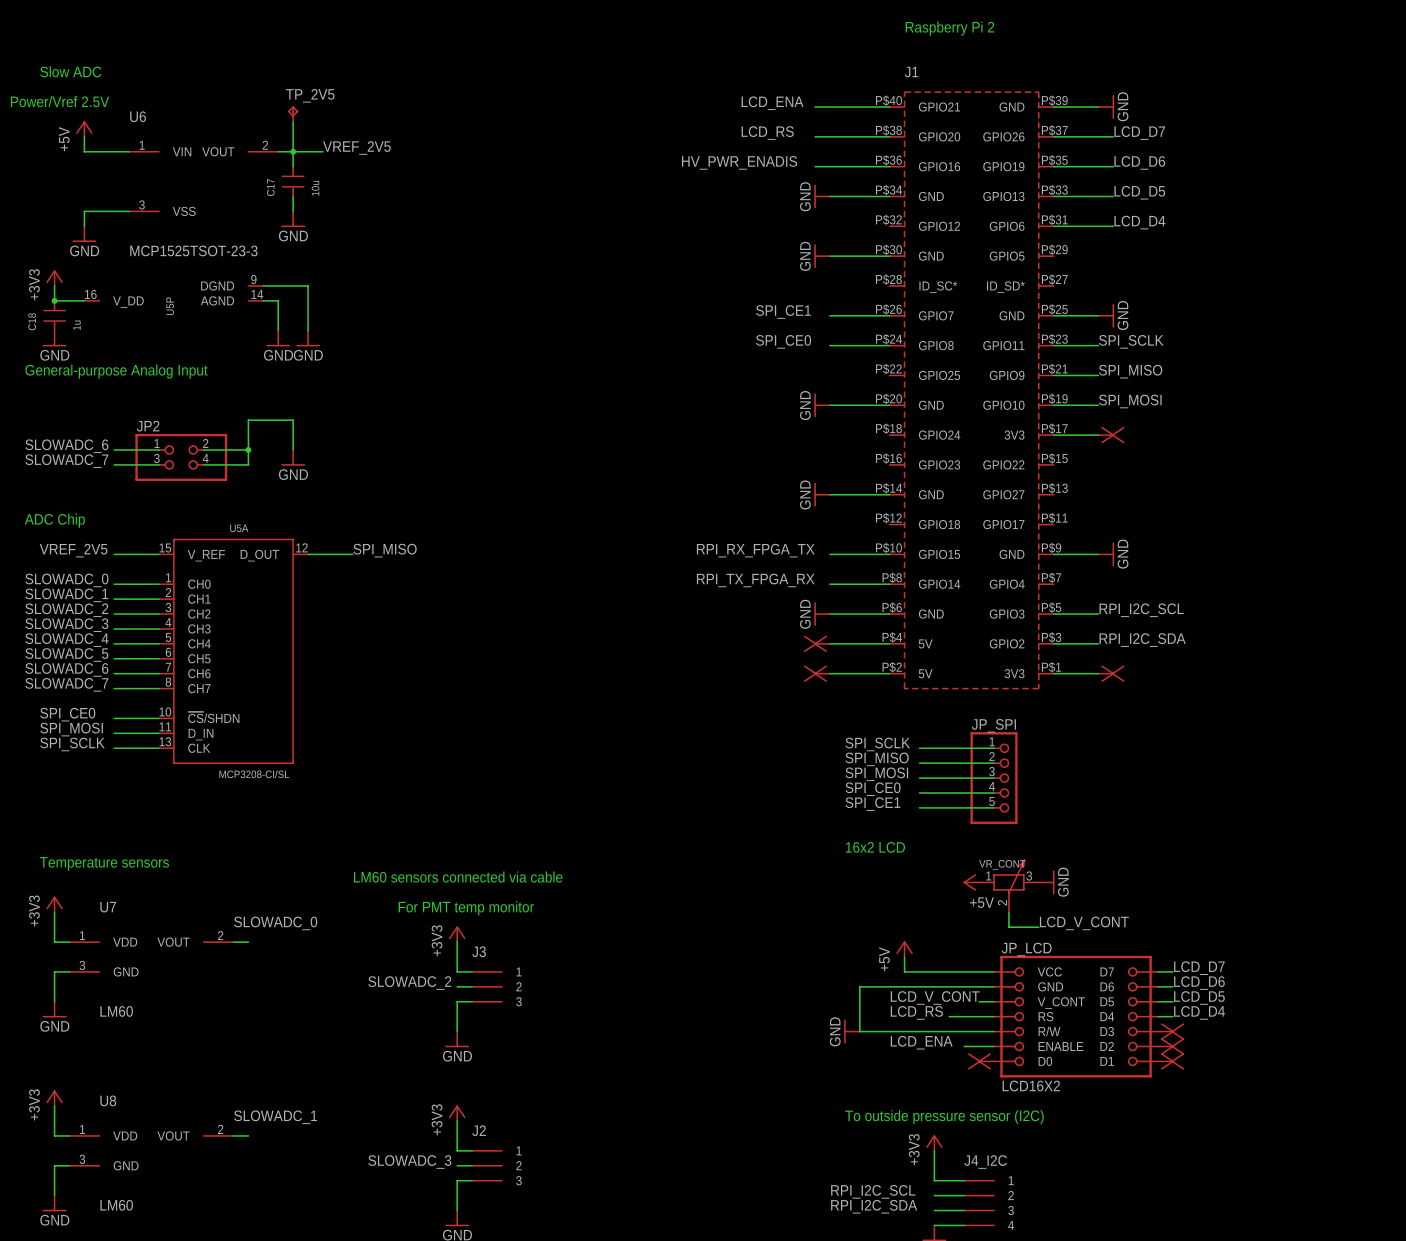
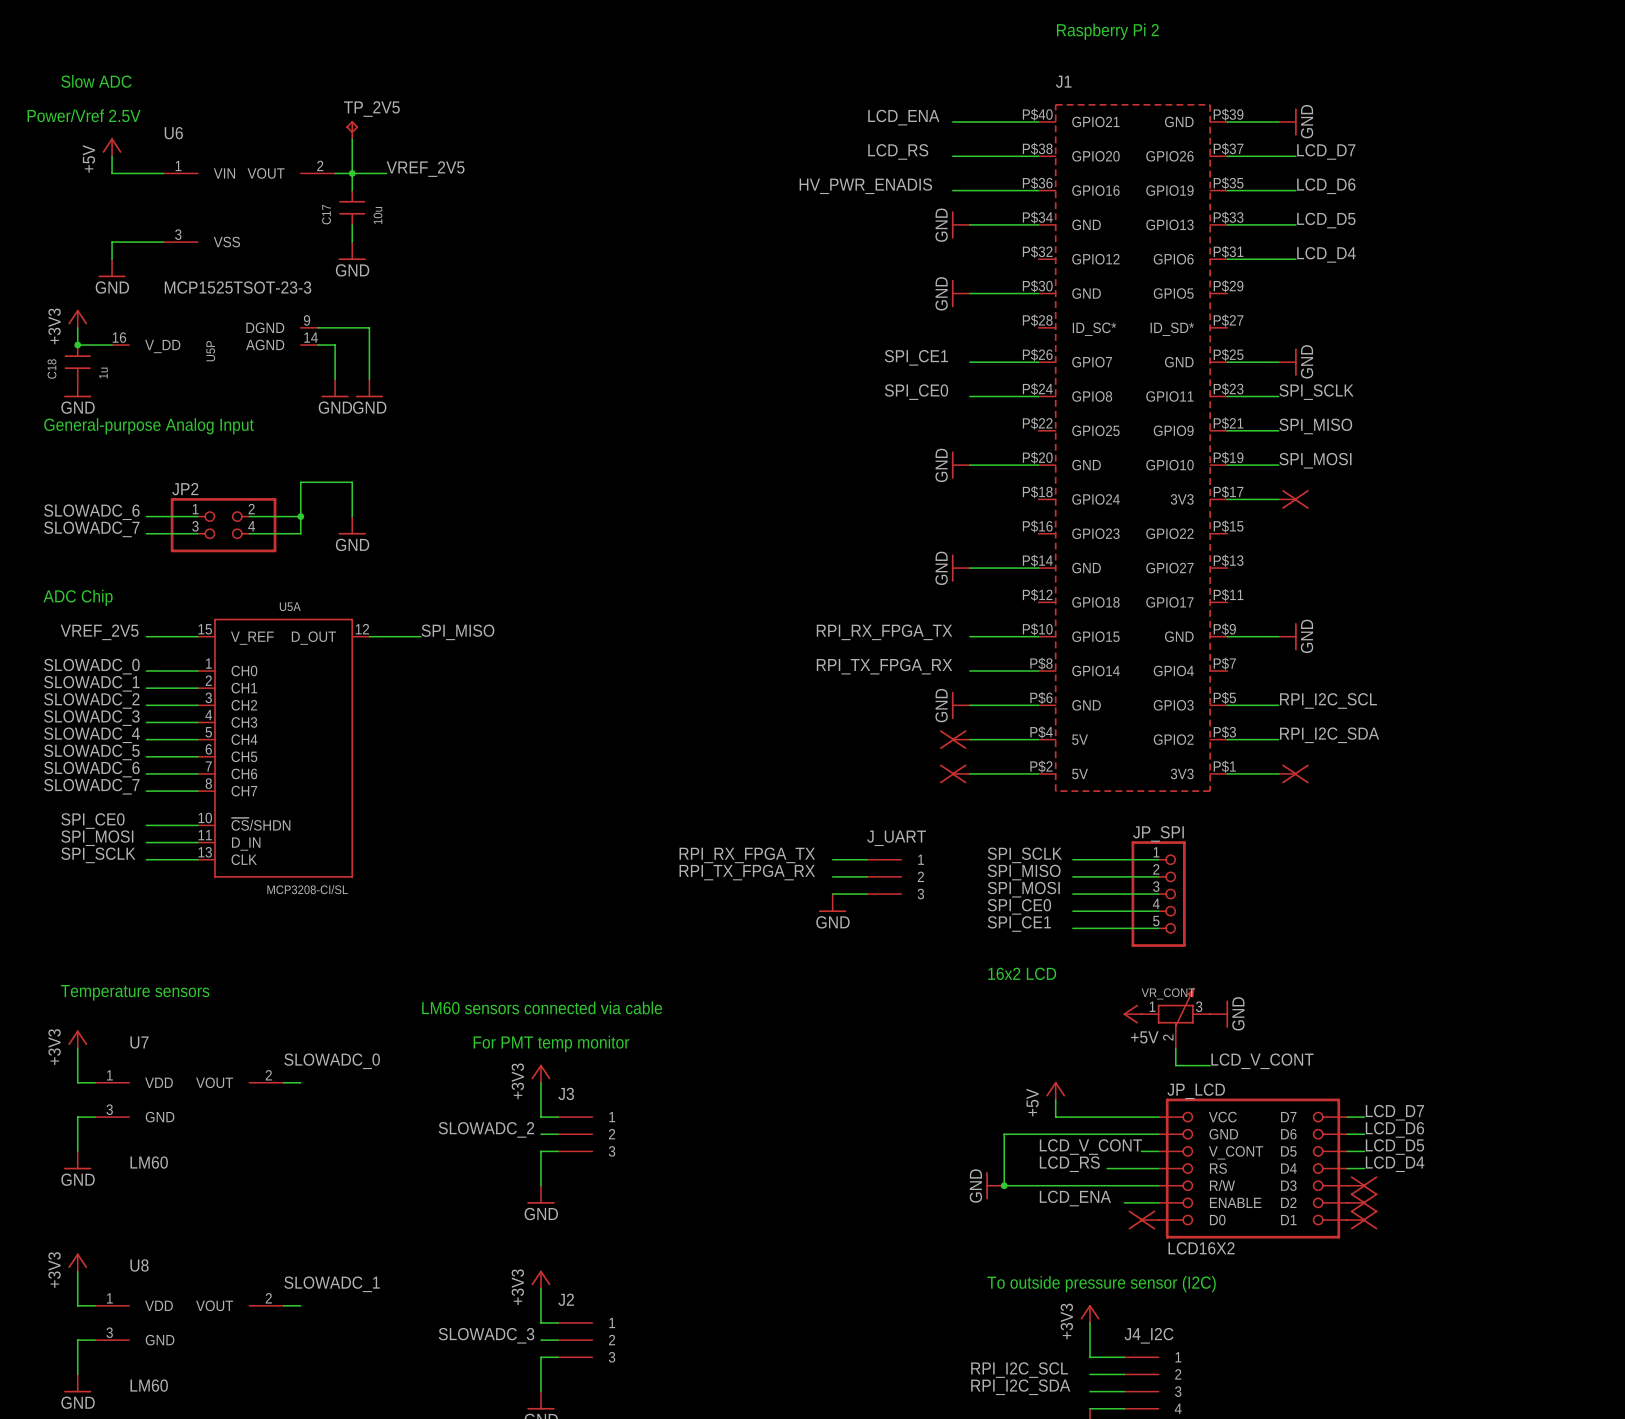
label: none -> RPI_RX_FPGA_TX (747, 855)
wire: none -> (832, 859) (866, 859)
label: none -> RPI_TX_FPGA_RX (747, 872)
wire: none -> (832, 876) (866, 876)
J_UART: none -> (884, 876)
wire: none -> (832, 894) (866, 894)
power symbol: none -> GND (832, 903)
junction: none -> (1004, 1185)

